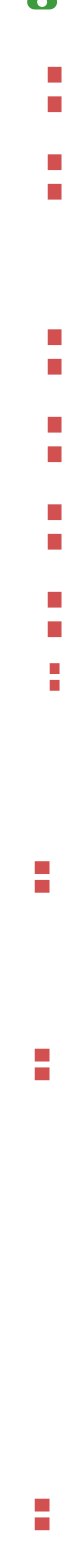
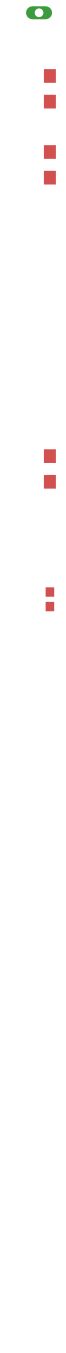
part: (54, 351) -> none
part: (54, 439) -> none
part: (54, 614) -> none
part: (42, 876) -> none
part: (42, 1064) -> none
part: (42, 1514) -> none

